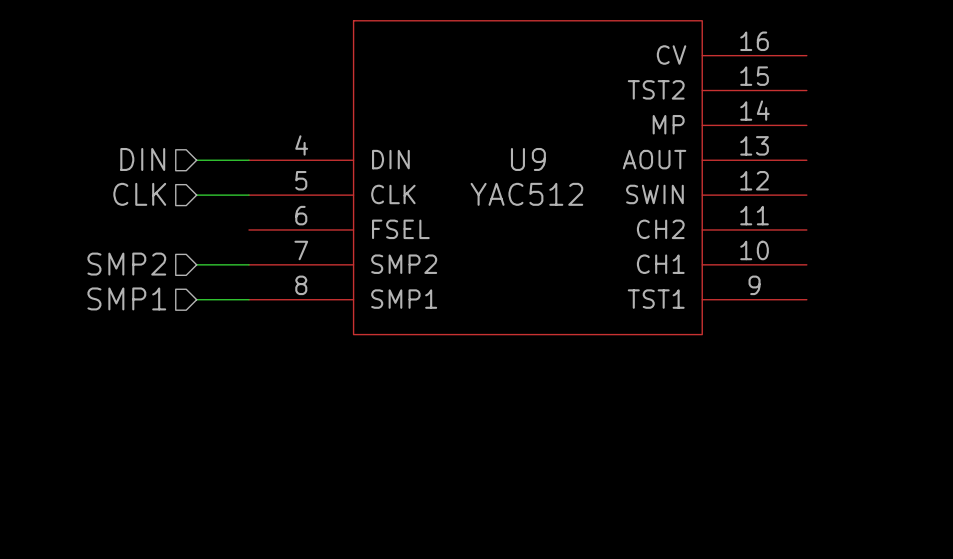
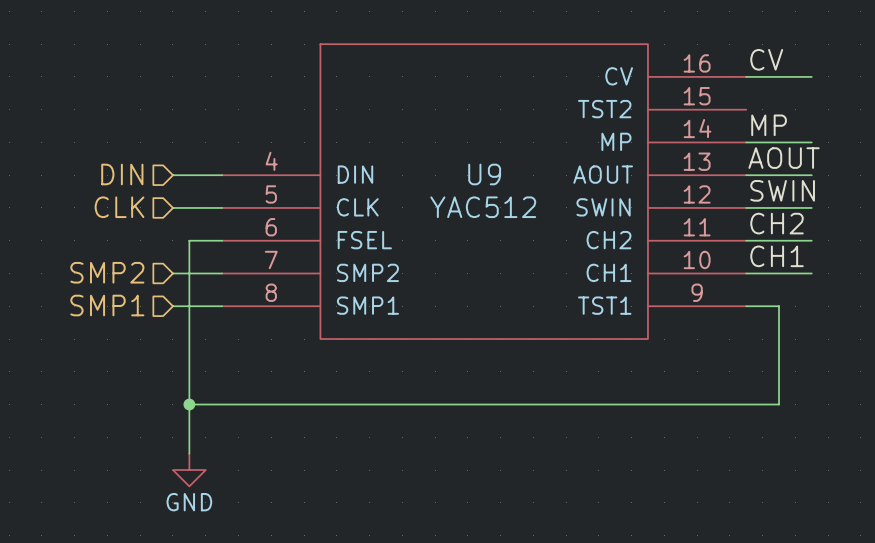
label: none -> CV (766, 59)
wire: none -> (746, 76) (811, 76)
label: none -> MP (769, 125)
wire: none -> (746, 142) (811, 142)
label: none -> AOUT (784, 158)
wire: none -> (746, 175) (811, 175)
label: none -> SWIN (782, 190)
wire: none -> (746, 207) (811, 207)
label: none -> CH2 (777, 223)
wire: none -> (222, 240) (189, 240) (189, 453)
wire: none -> (746, 240) (811, 240)
label: none -> CH1 (777, 256)
wire: none -> (746, 273) (811, 273)
wire: none -> (746, 306) (779, 306) (779, 404) (189, 404)
junction: none -> (189, 404)
power symbol: none -> GND (189, 470)

